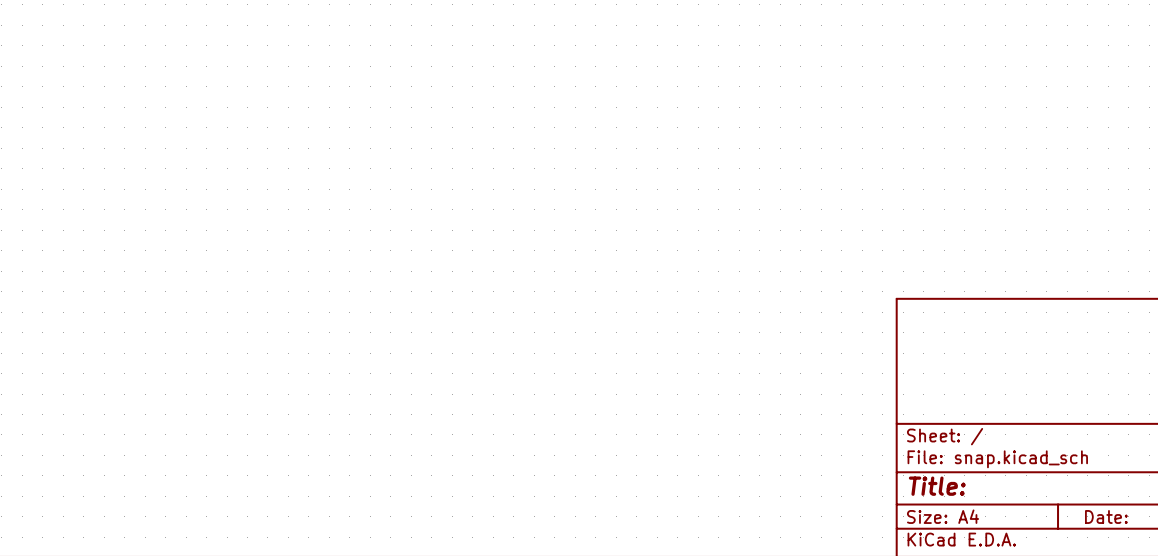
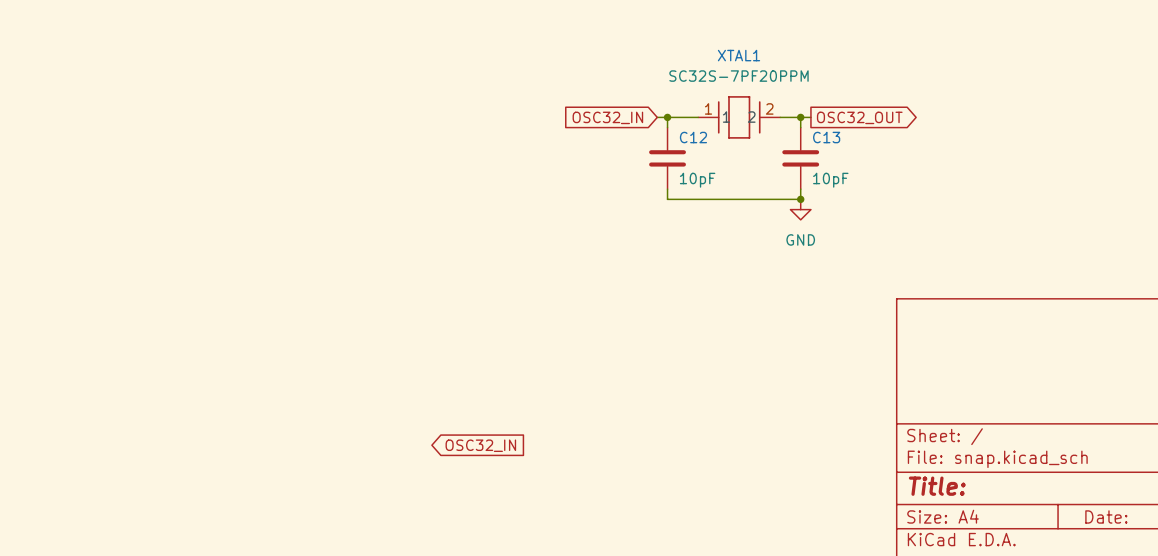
global label: none -> OSC32_IN (607, 117)
wire: none -> (657, 117) (698, 117)
wire: none -> (667, 117) (667, 127)
junction: none -> (667, 117)
XTAL1: none -> SC32S-7PF20PPM (739, 117)
wire: none -> (780, 117) (810, 117)
wire: none -> (800, 117) (800, 127)
junction: none -> (800, 117)
global label: none -> OSC32_OUT (859, 117)
C12: none -> 10pF (667, 158)
C13: none -> 10pF (800, 158)
wire: none -> (667, 189) (667, 199) (800, 199) (800, 189)
junction: none -> (800, 199)
power symbol: none -> GND (800, 209)
global label: none -> OSC32_IN (480, 445)

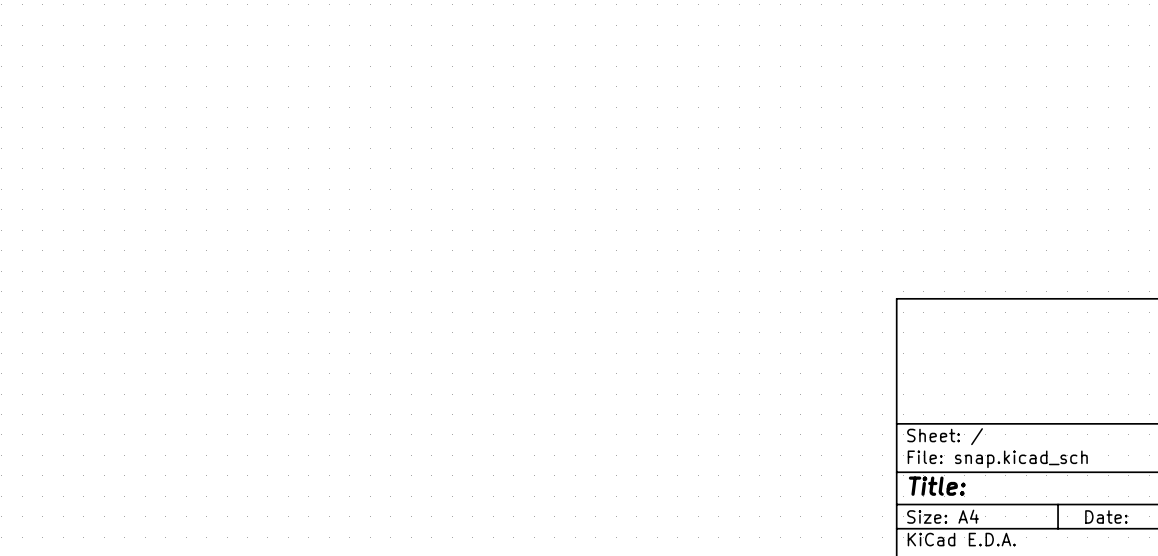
global label: OSC32_IN (607, 117) -> none
wire: (657, 117) (698, 117) -> none
wire: (667, 117) (667, 127) -> none
junction: (667, 117) -> none
XTAL1: SC32S-7PF20PPM (739, 117) -> none
wire: (780, 117) (810, 117) -> none
wire: (800, 117) (800, 127) -> none
junction: (800, 117) -> none
global label: OSC32_OUT (859, 117) -> none
C12: 10pF (667, 158) -> none
C13: 10pF (800, 158) -> none
wire: (667, 189) (667, 199) (800, 199) (800, 189) -> none
junction: (800, 199) -> none
power symbol: GND (800, 209) -> none
global label: OSC32_IN (480, 445) -> none

